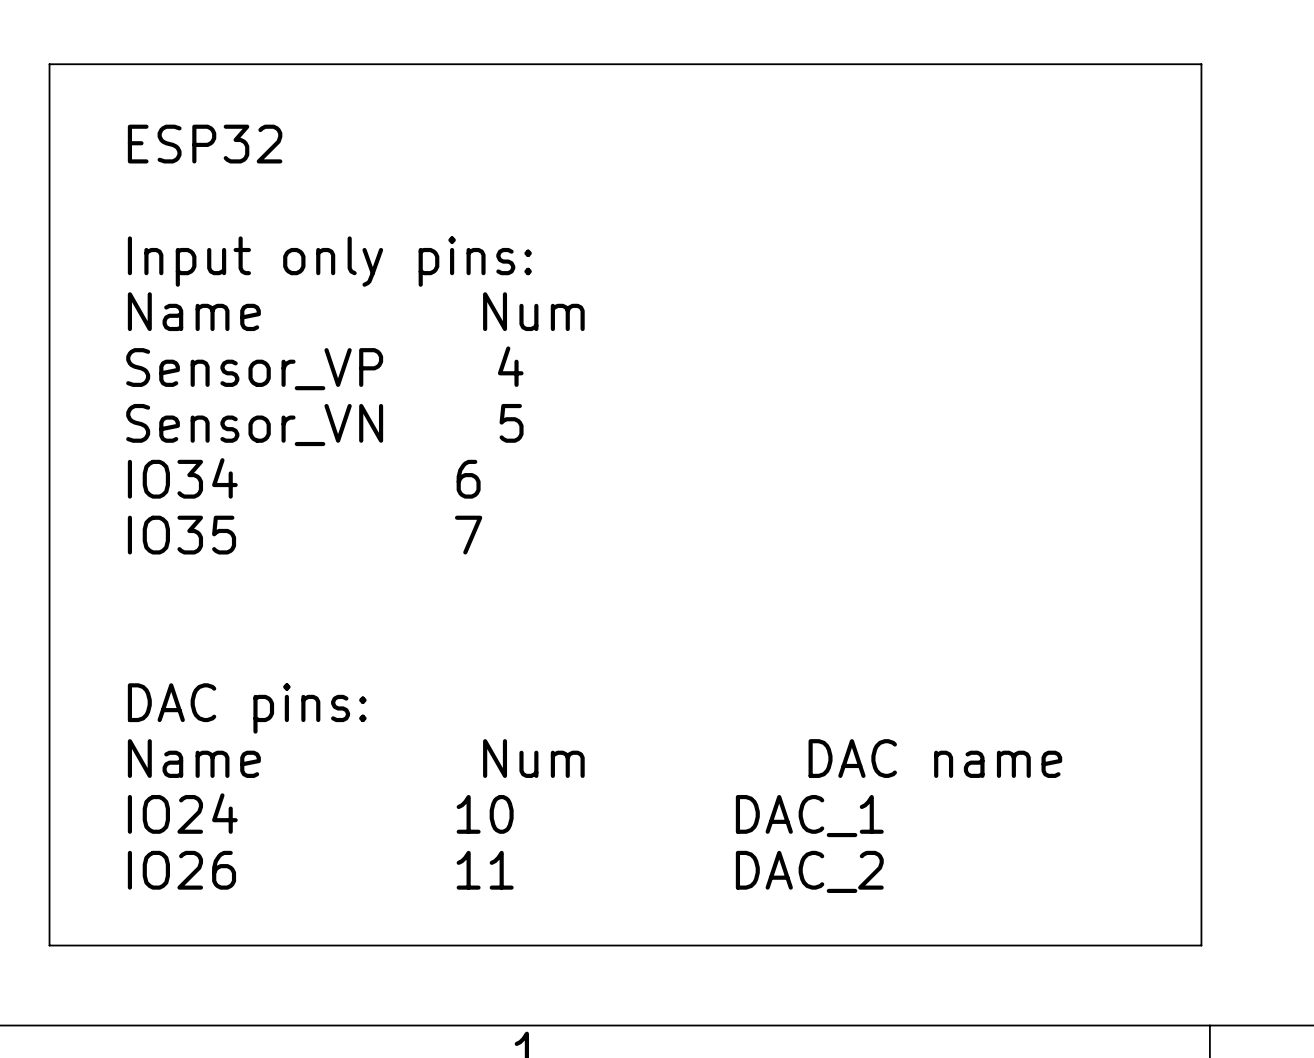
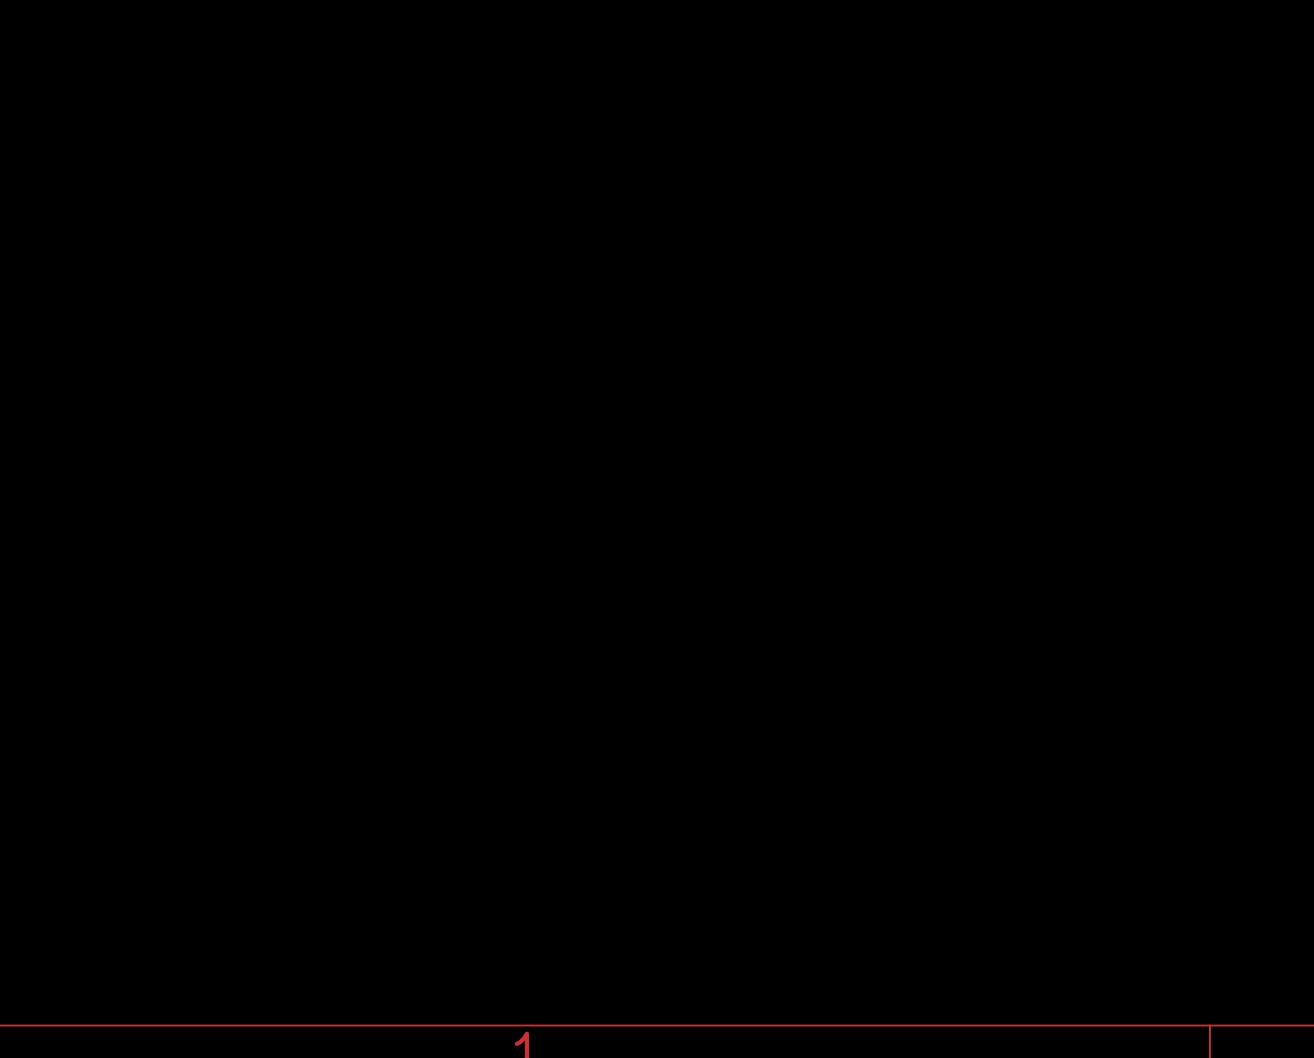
line: (49, 64) (1201, 64) (1201, 945) (49, 945) (49, 64) -> none
text: ESP32 (205, 144) -> none
text: Input only pins: (329, 261) -> none
text: Name Num (356, 311) -> none
text: Sensor_VP 4 (324, 368) -> none
text: Sensor_VN 5 (324, 425) -> none
text: IO34 6 (304, 478) -> none
text: IO35 7 (305, 535) -> none
text: DAC pins: (247, 708) -> none
text: Name Num DAC name (595, 758) -> none
text: IO24 10 DAC_1 (505, 815) -> none
text: IO26 11 DAC_2 (505, 871) -> none

